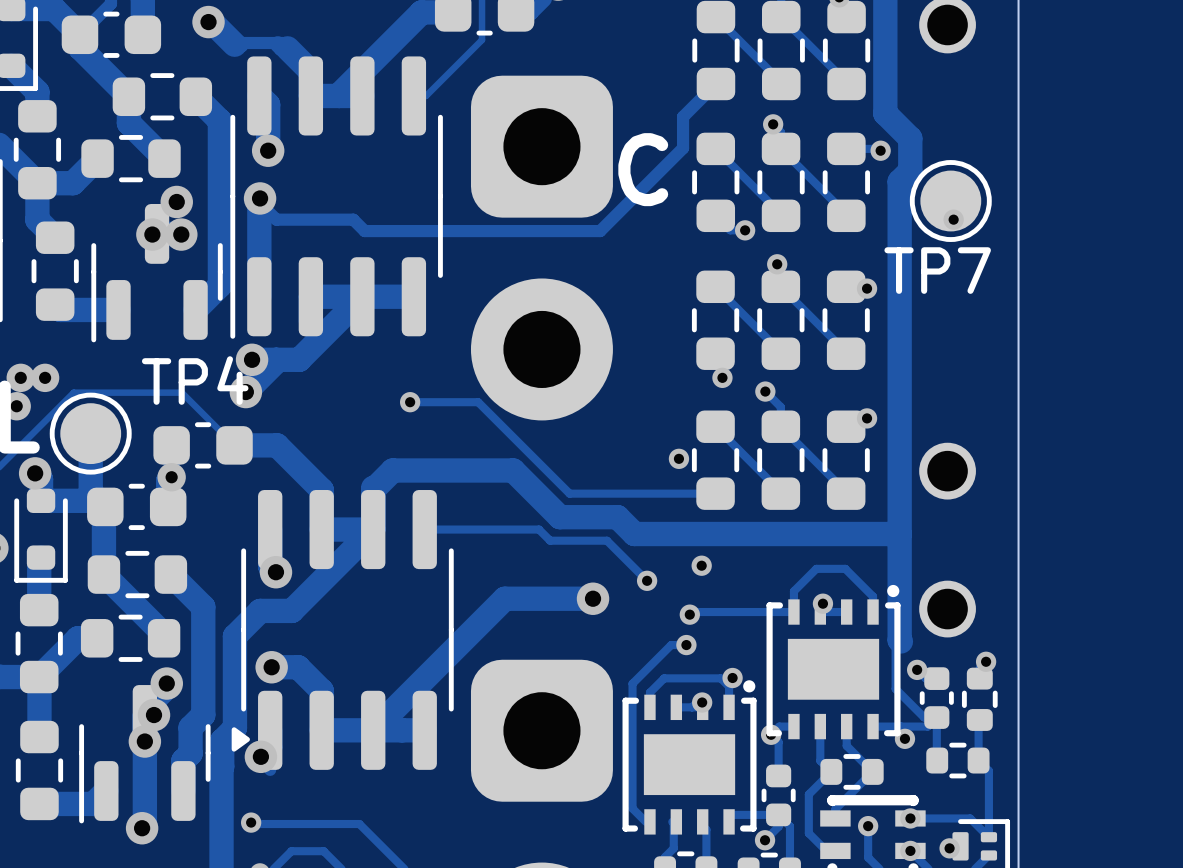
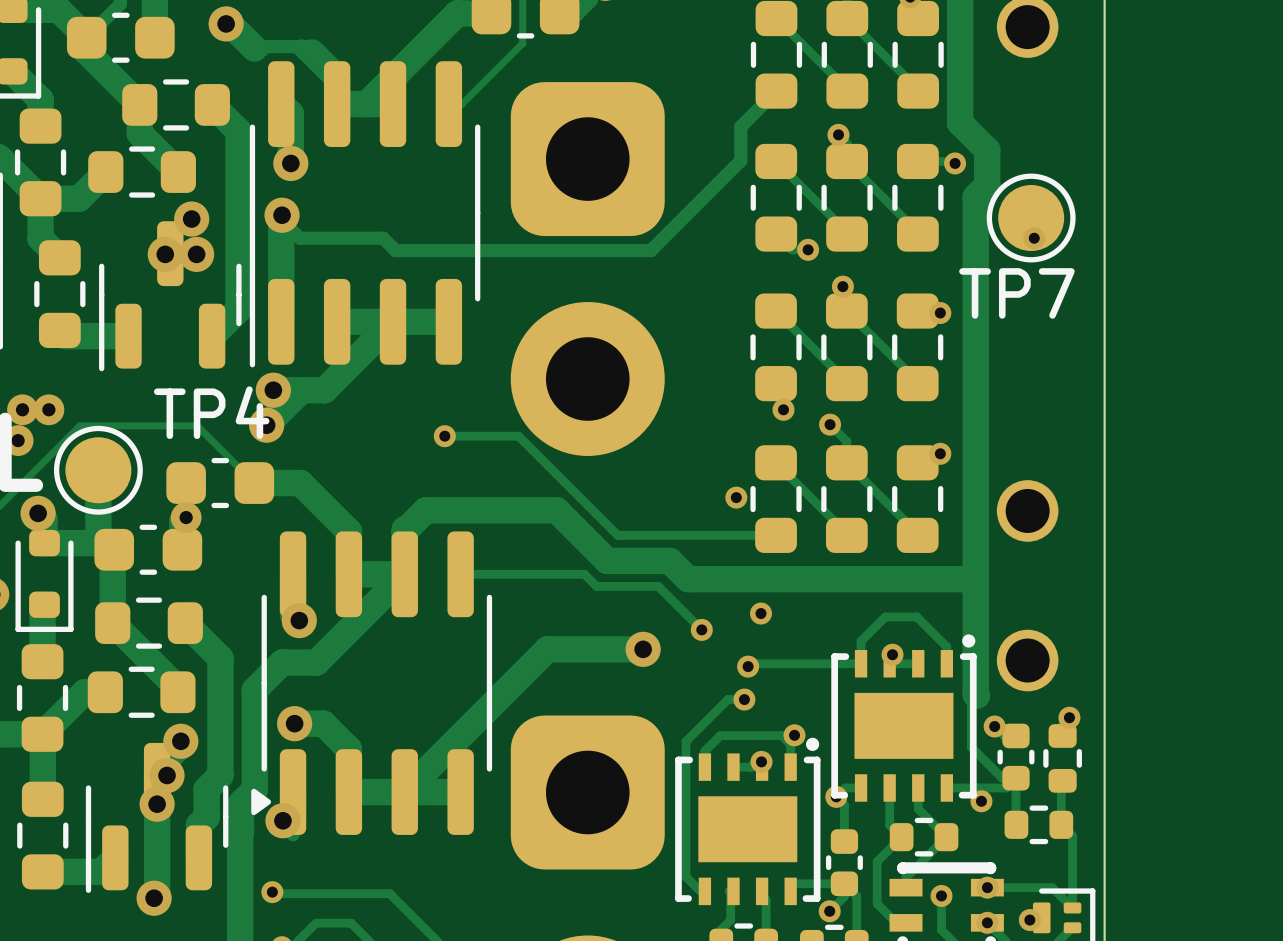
text: C (643, 169) -> none

